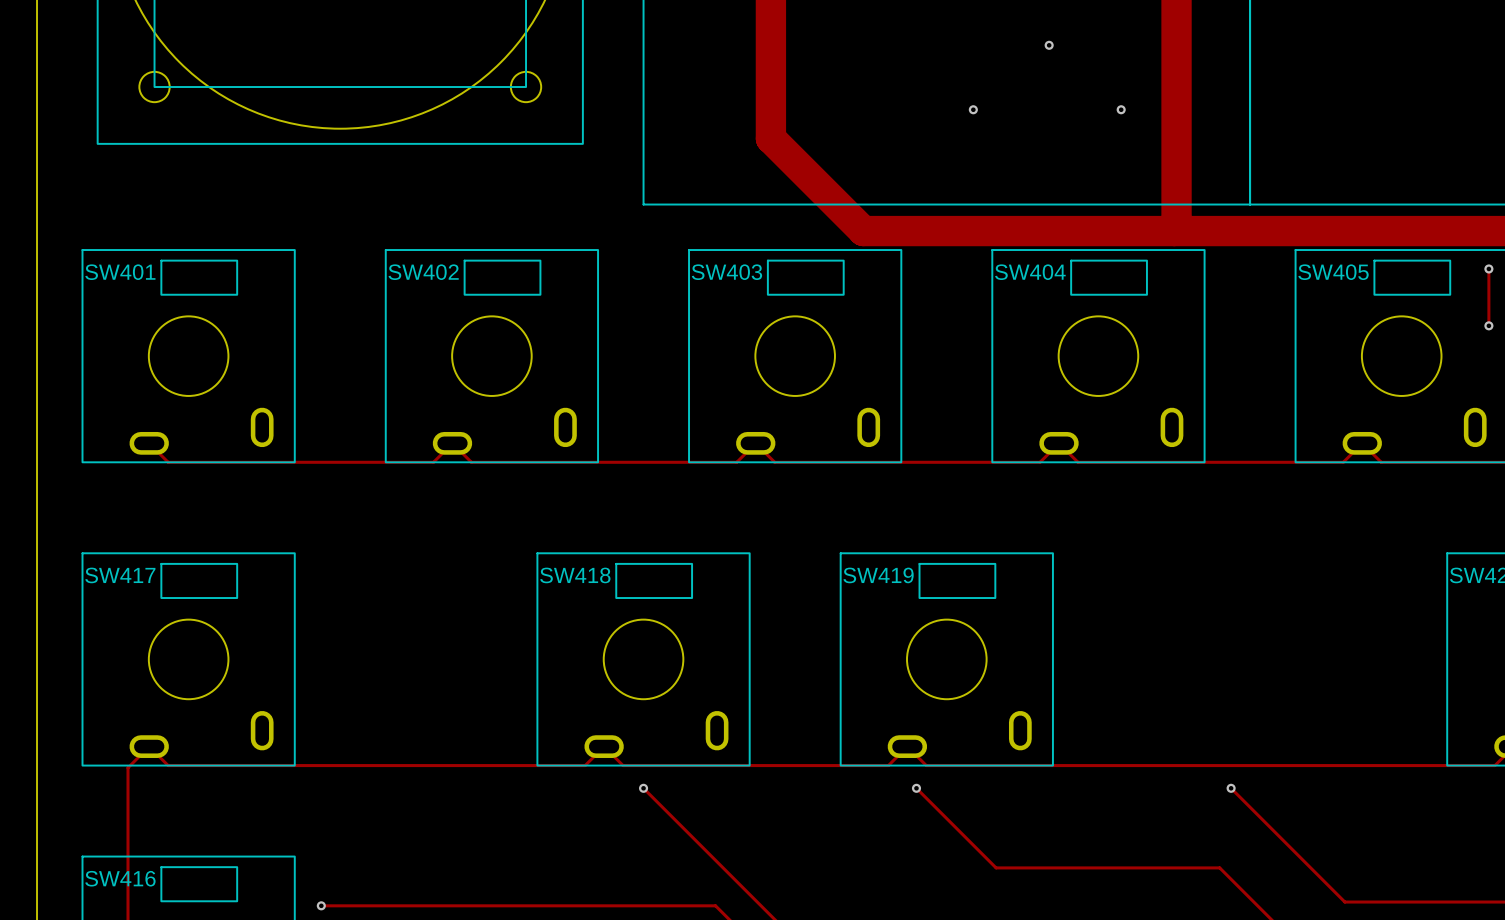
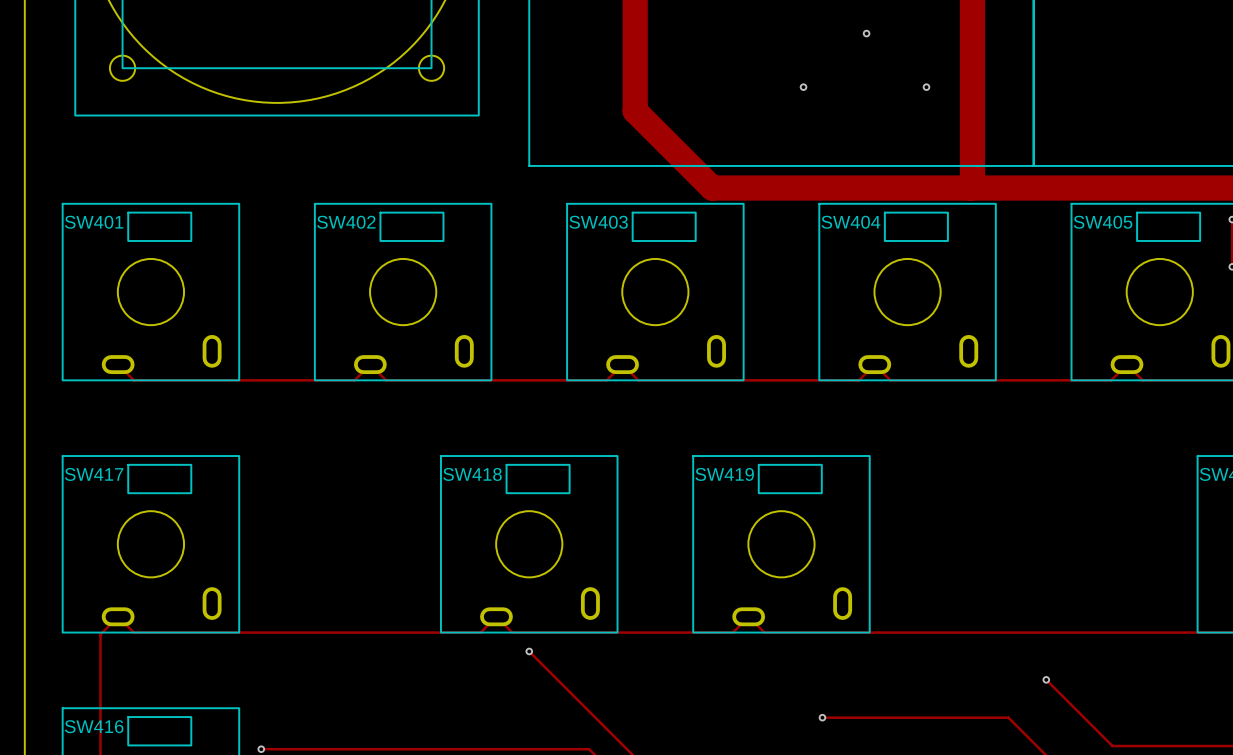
track: (916, 788) (996, 867) -> none
via: (916, 788) -> none
track: (1231, 788) (1265, 822) -> none
via position: (1231, 788) -> (1046, 679)
via: none -> (822, 717)

